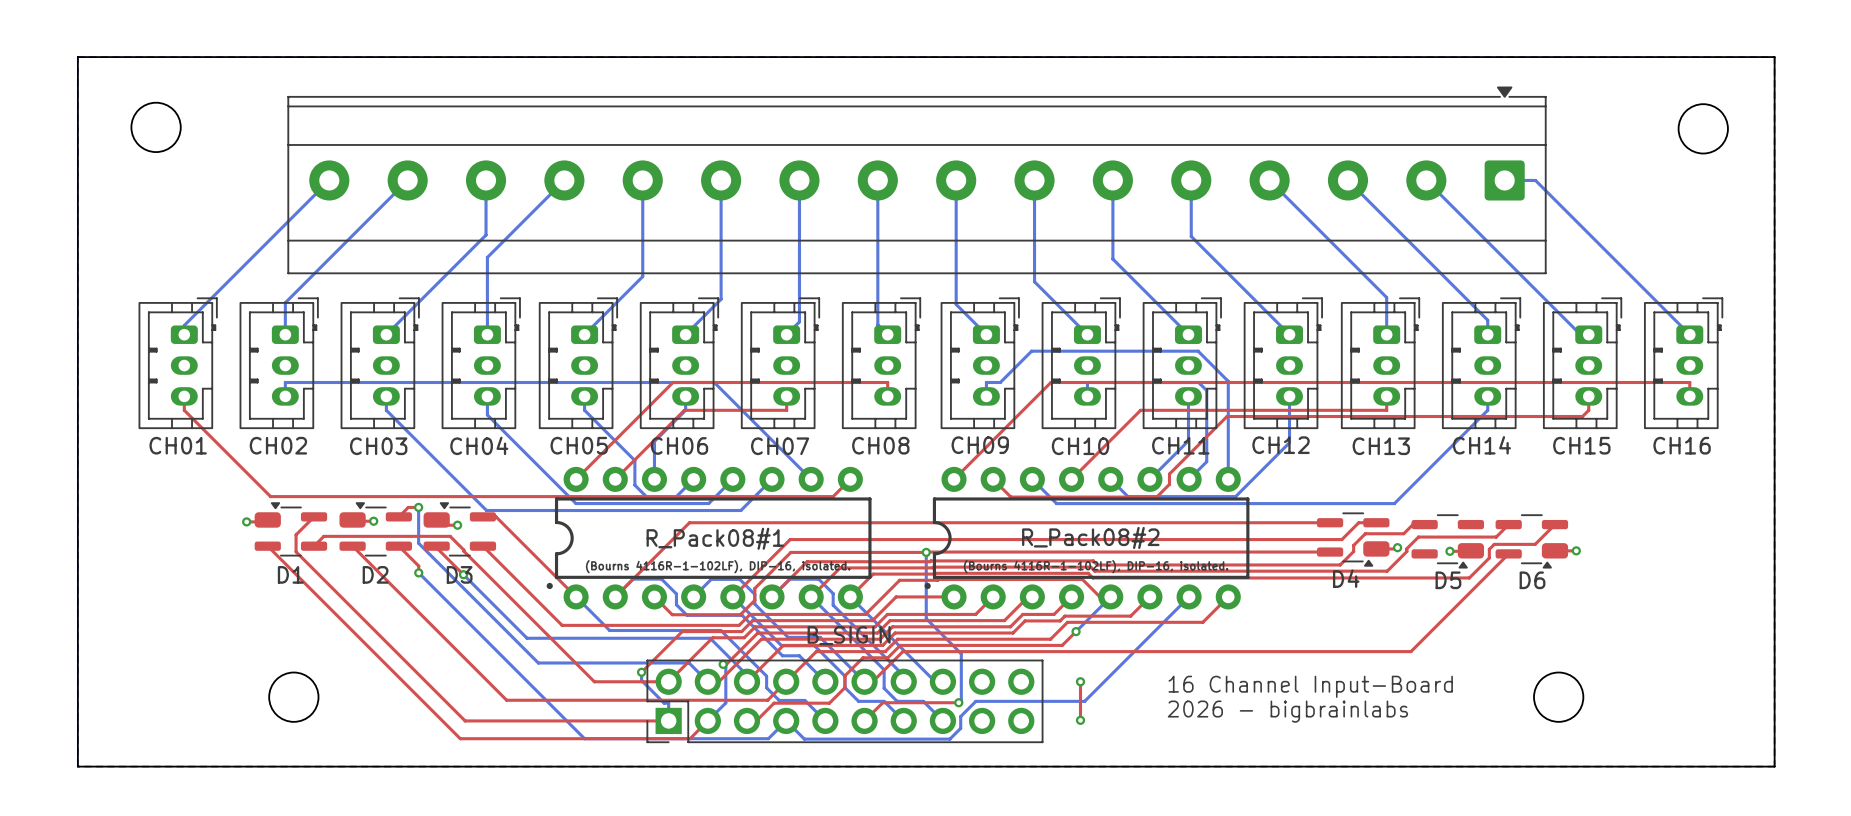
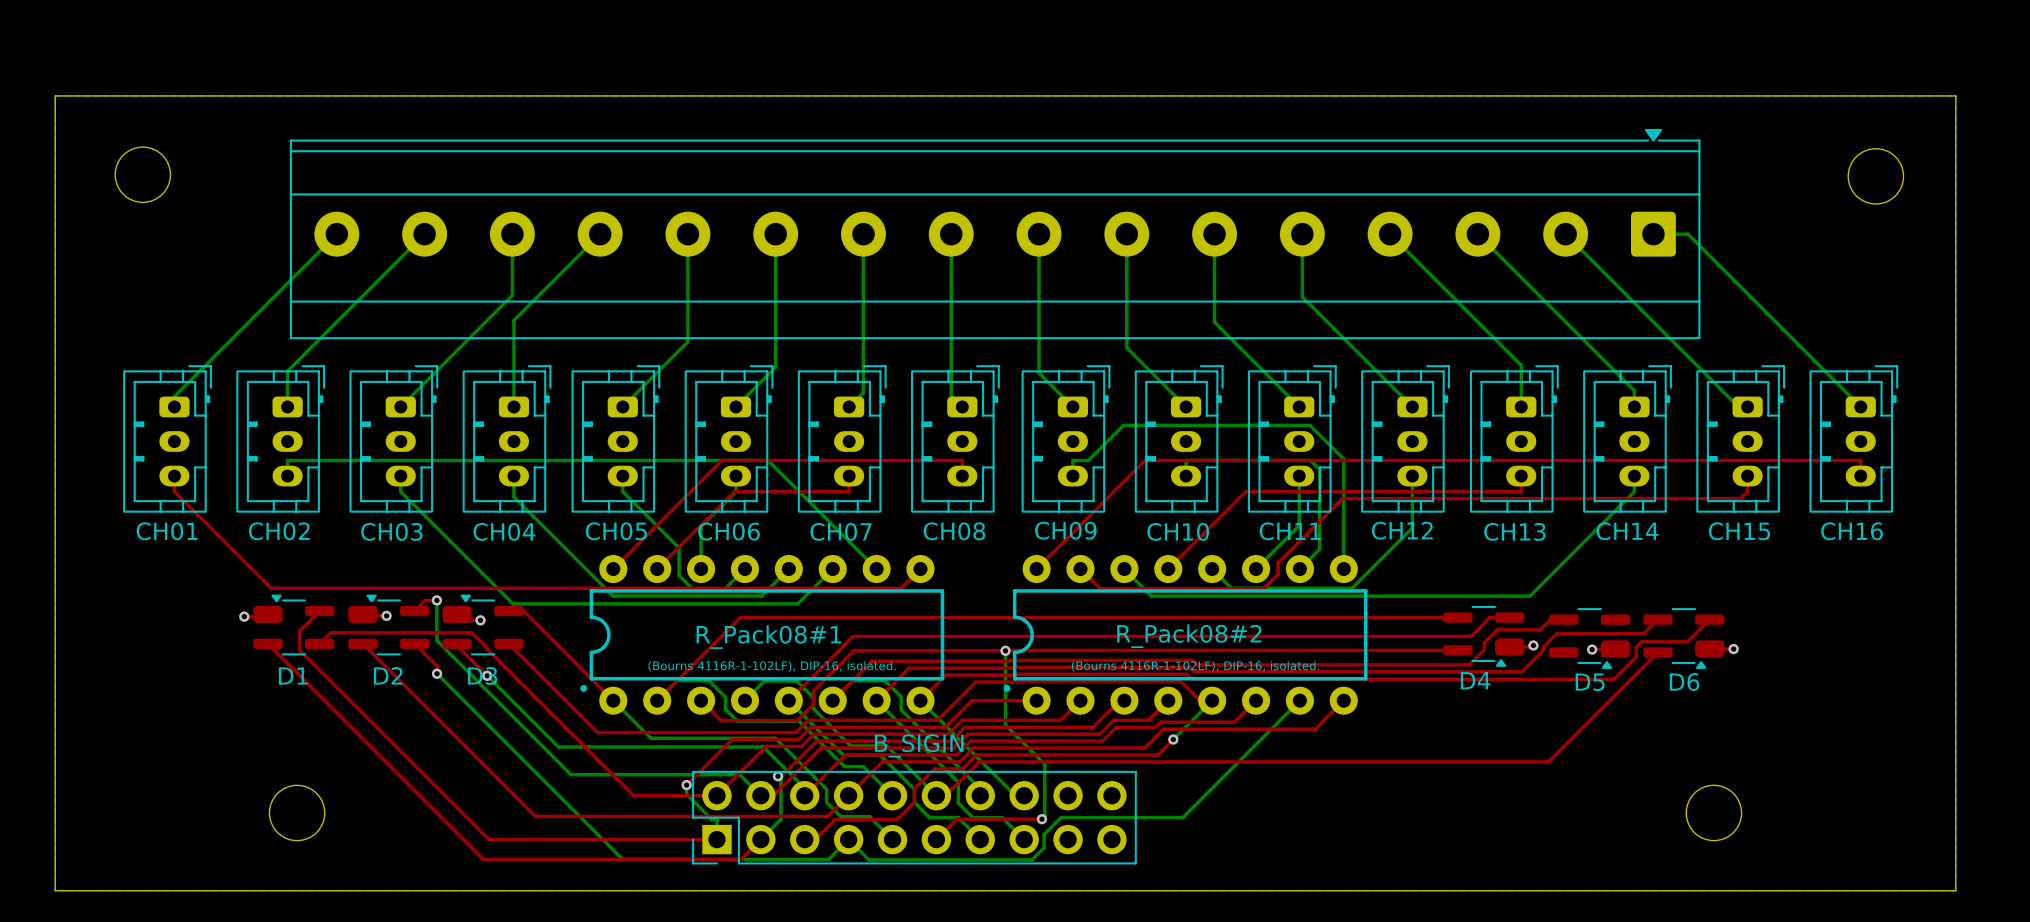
top track: (1080, 681) (1080, 720) -> none
via: (1080, 681) -> none
text: 16 Channel Input-Board (1310, 686) -> none
text: 2026 - bigbrainlabs (1287, 711) -> none
via: (1080, 720) -> none

